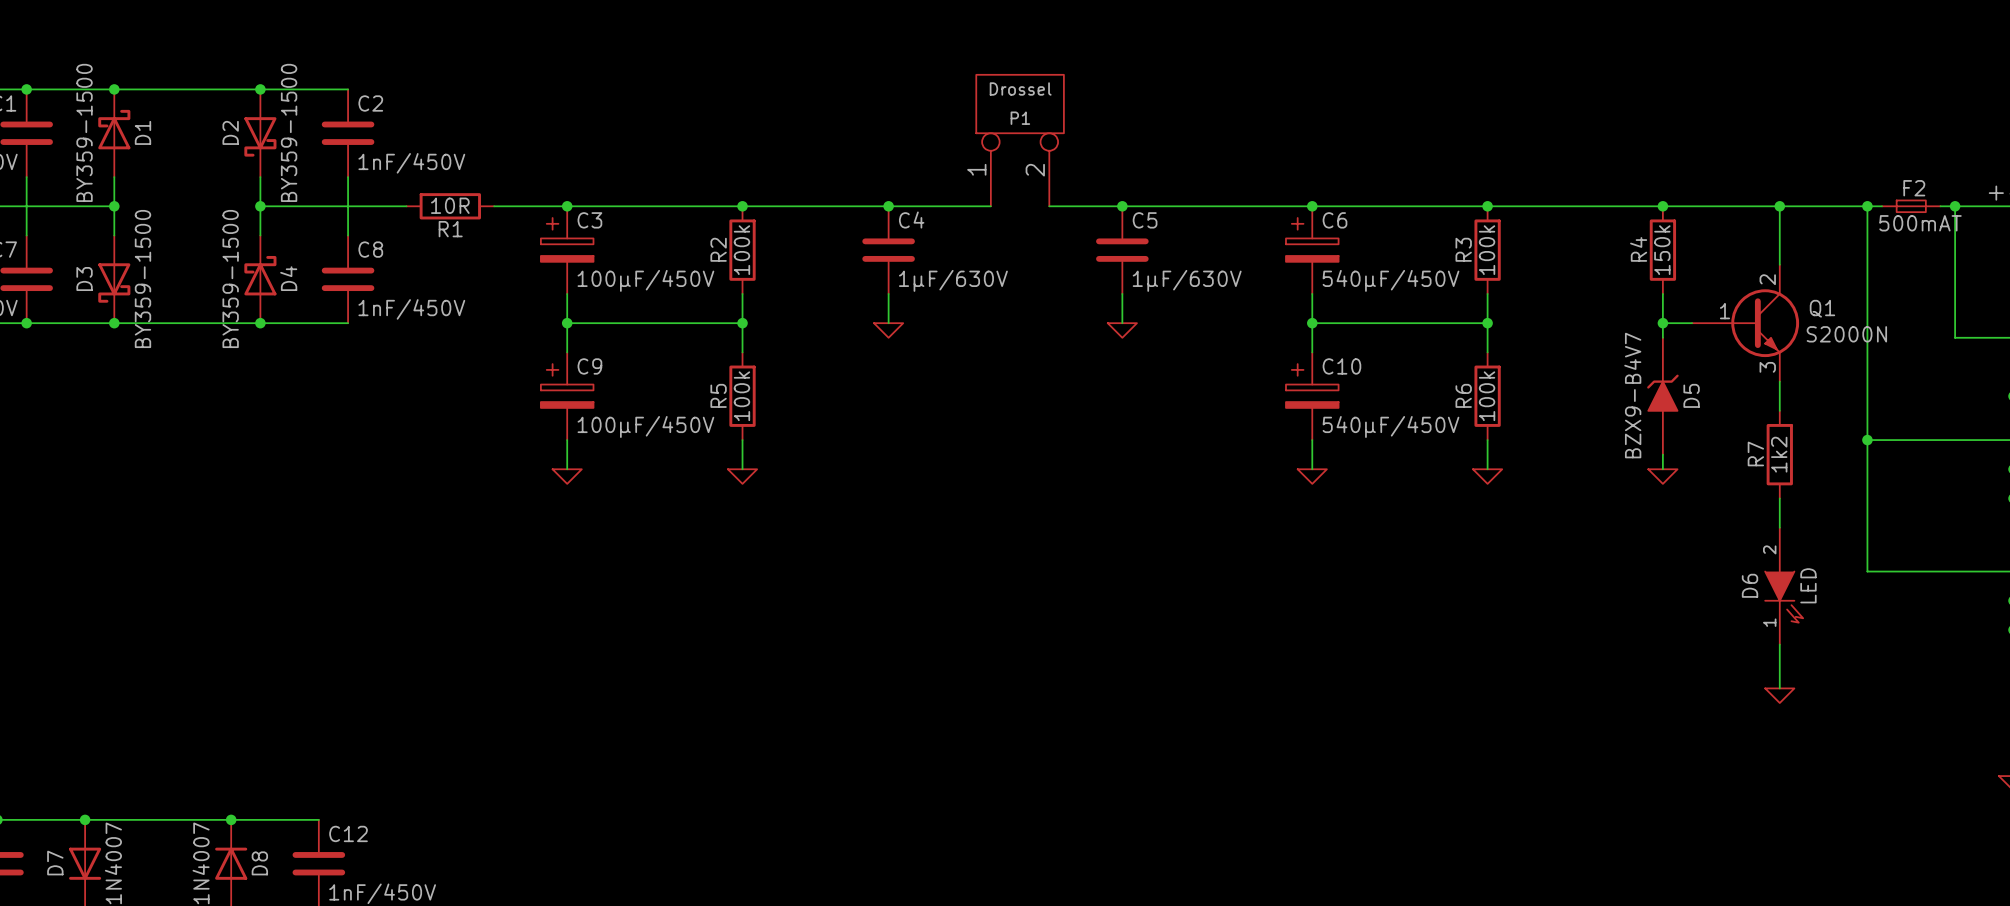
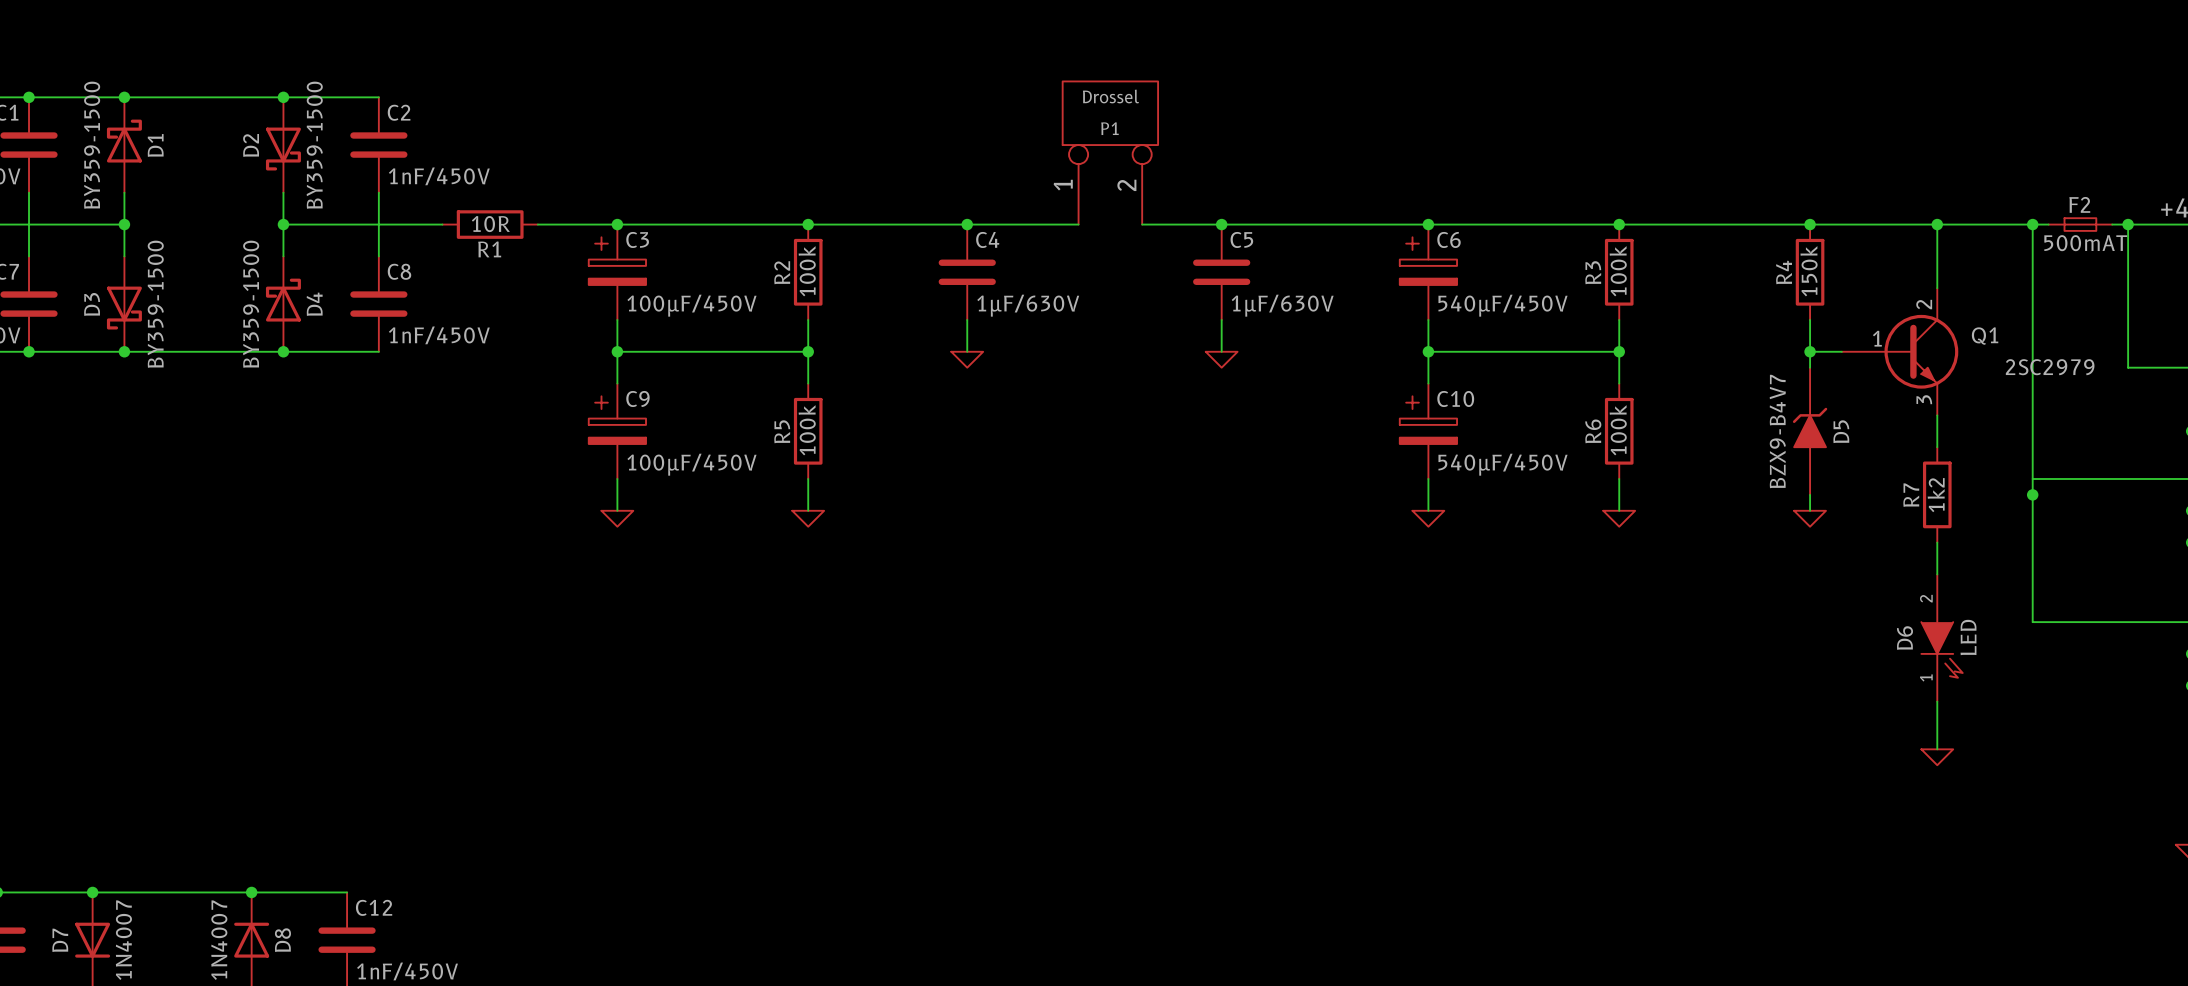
Q1 value: S2000N (1846, 334) -> 2SC2979 (2050, 367)
junction position: (1867, 440) -> (2032, 494)

